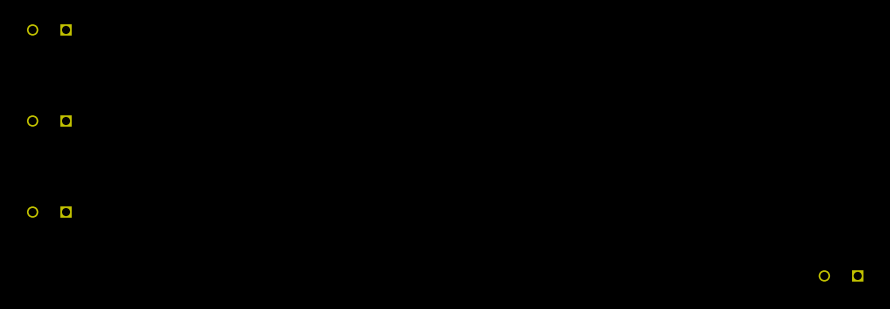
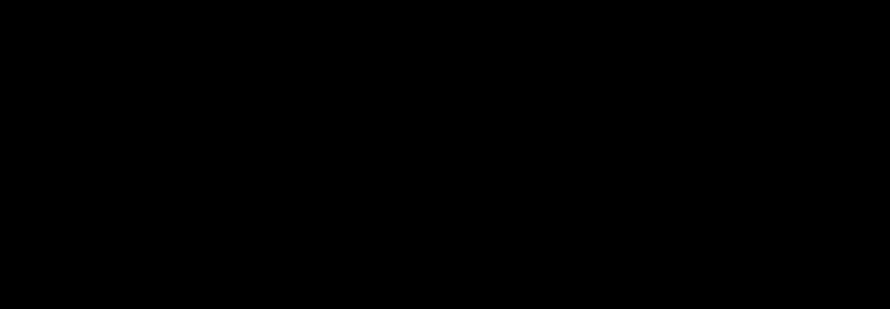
part: (49, 29) -> none
part: (49, 120) -> none
part: (49, 212) -> none
part: (841, 275) -> none

